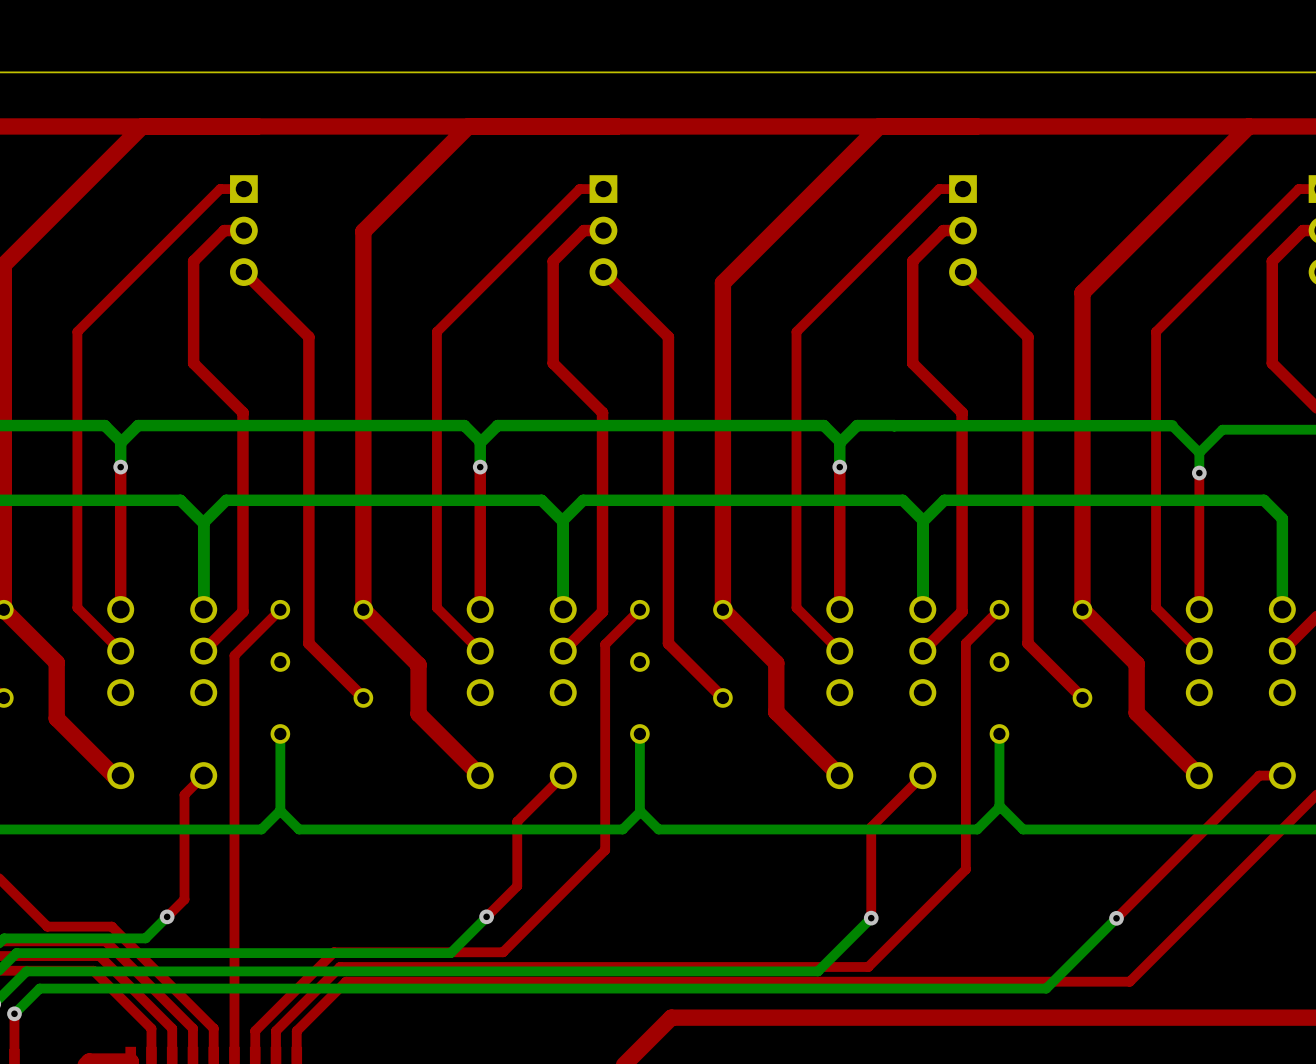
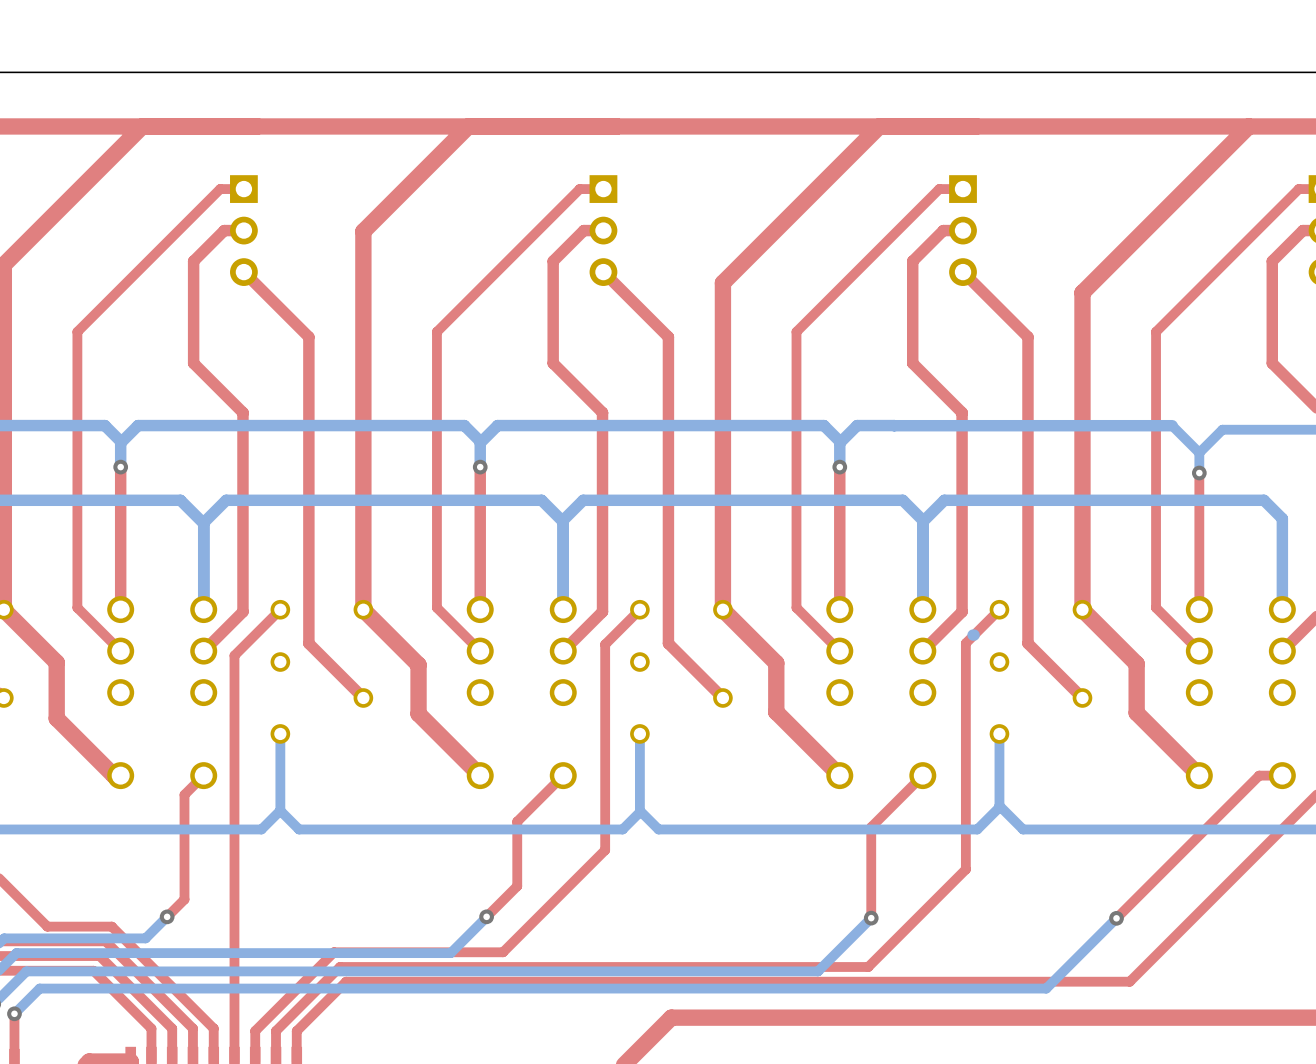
bottom track: none -> (974, 635) (973, 635)

